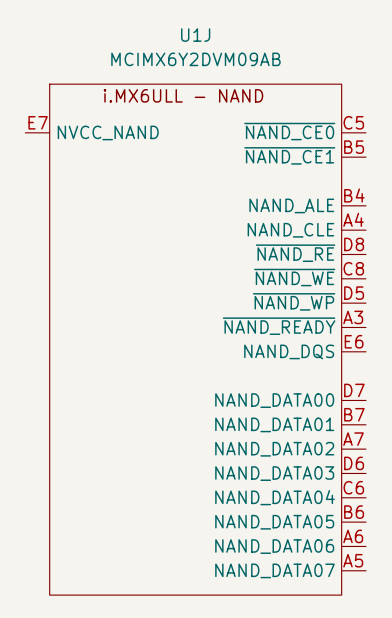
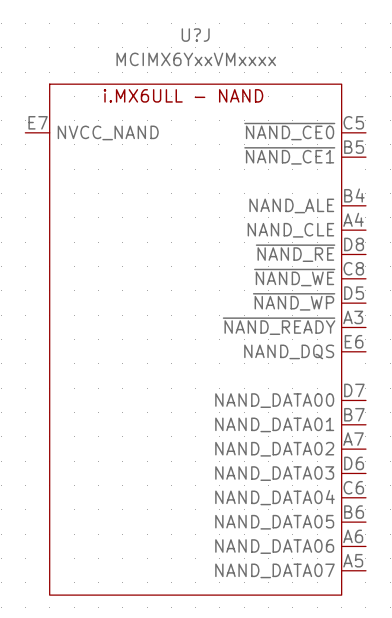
U1J name: U1J (195, 35) -> U?J (195, 35)
U1J value: MCIMX6Y2DVM09AB (195, 59) -> MCIMX6YxxVMxxxx (196, 59)

